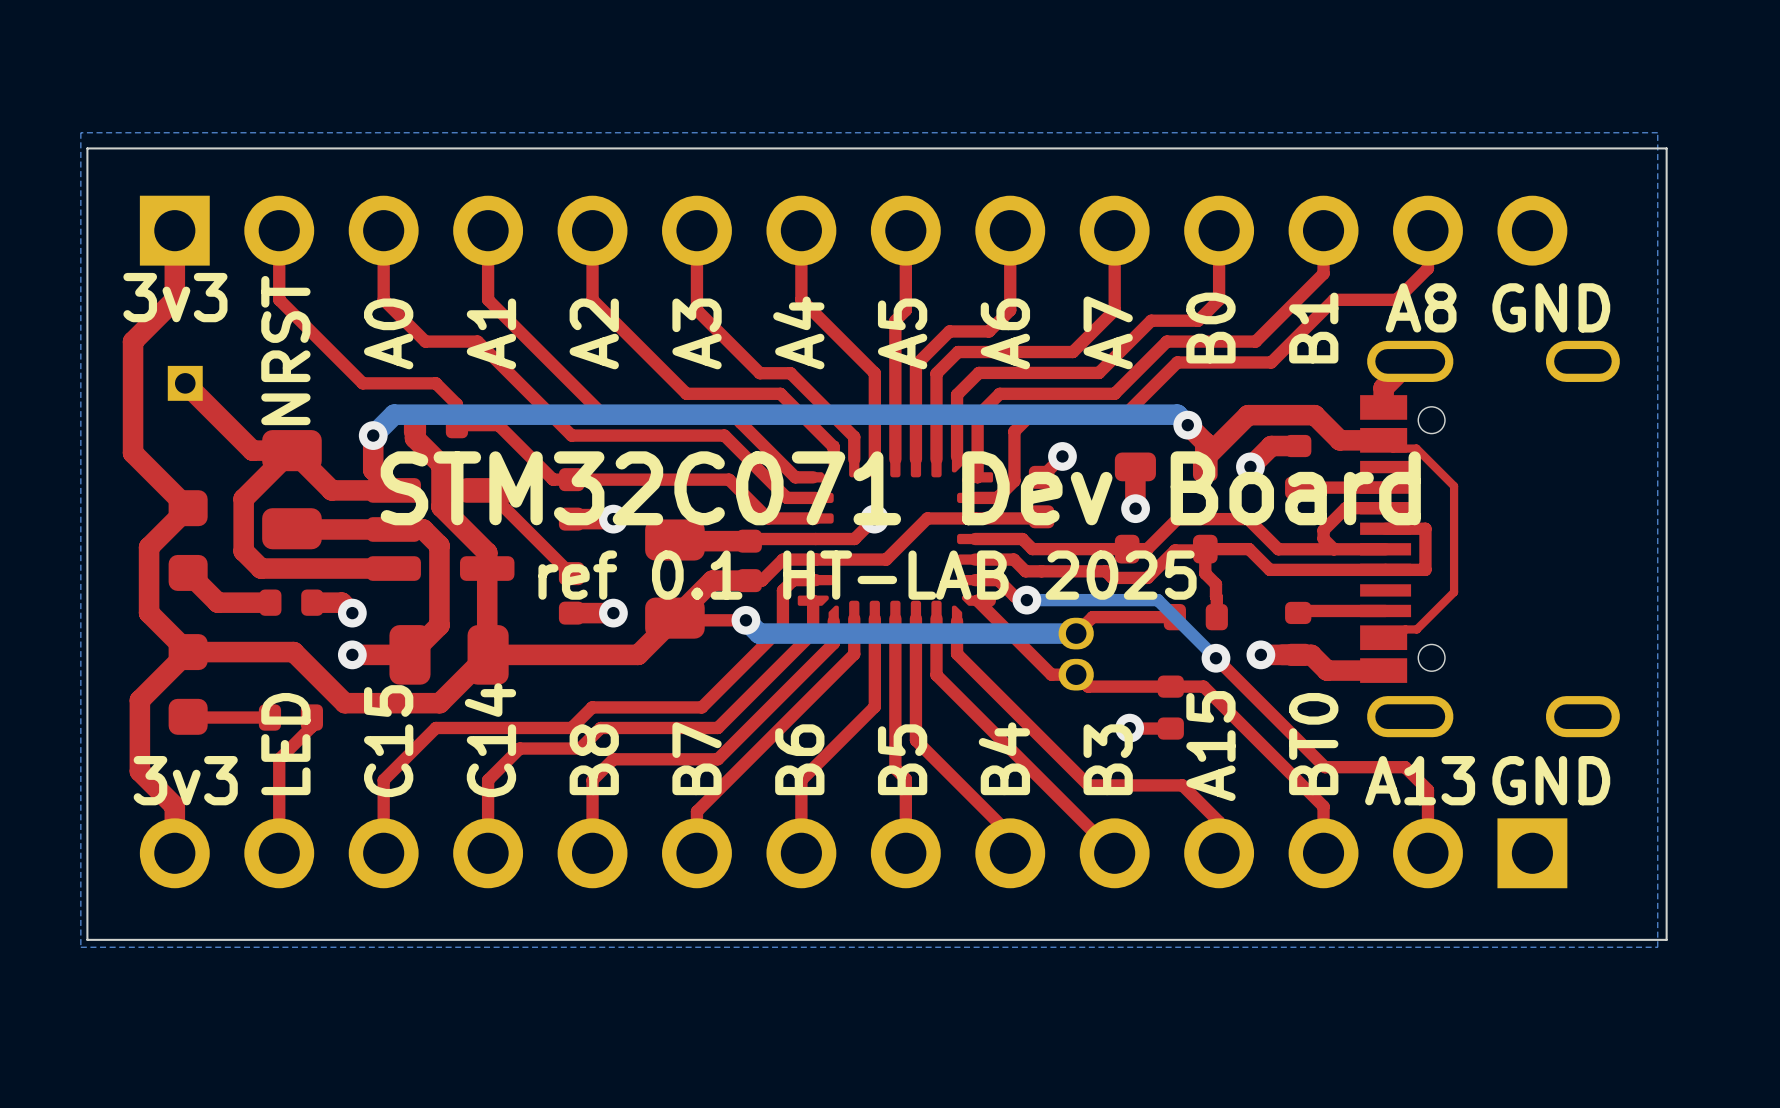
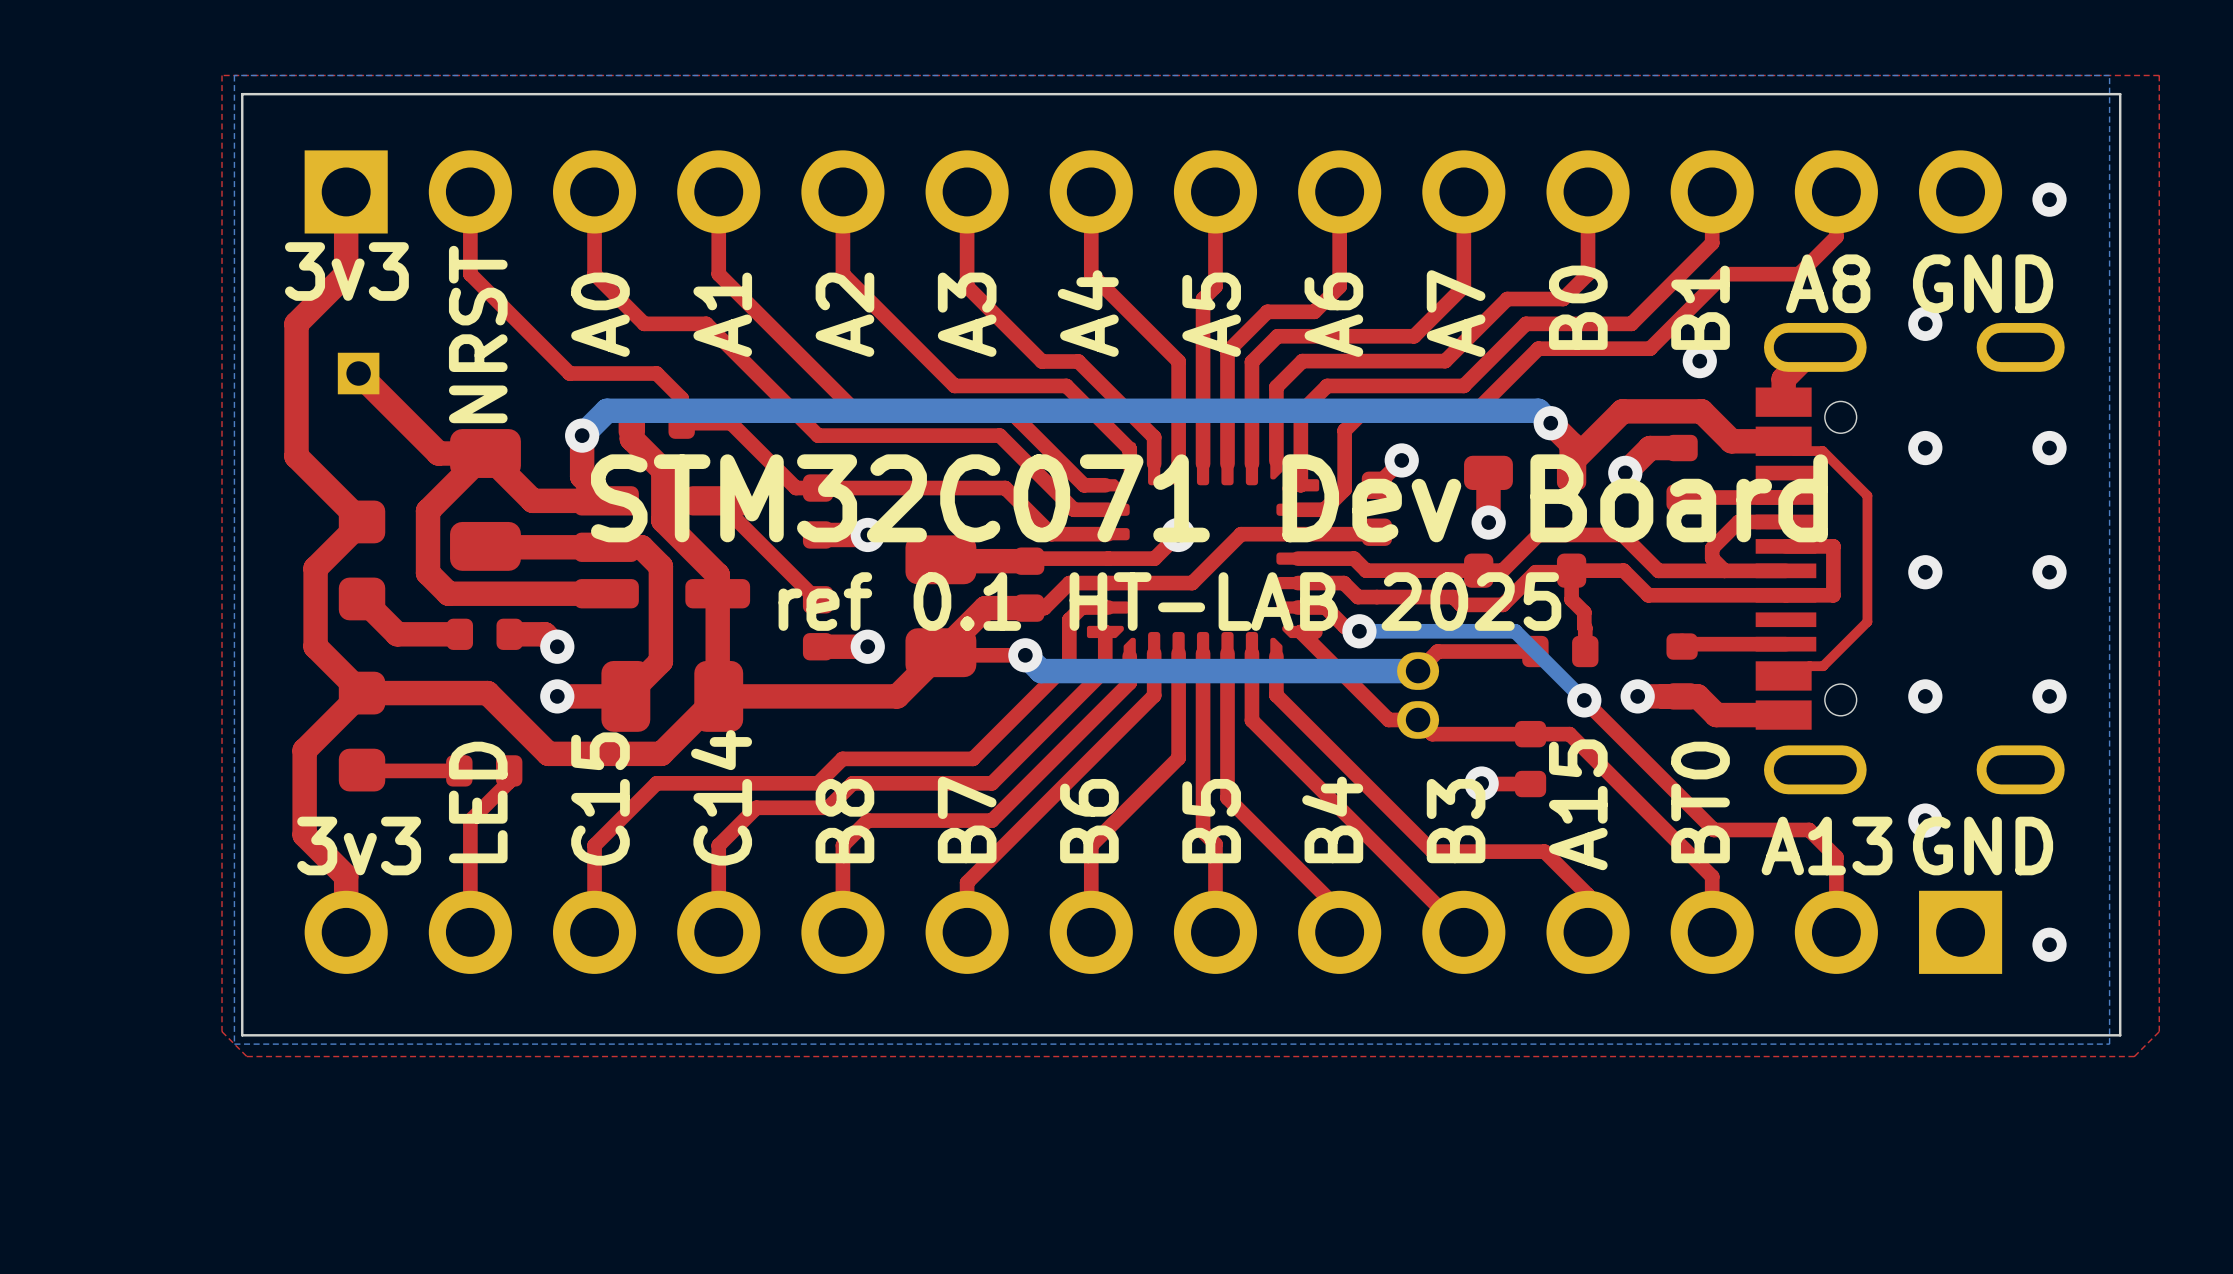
top zone outline: none -> (2159, 75) (2159, 1031) (2134, 1056) (246, 1056) (222, 1031) (222, 75) (2159, 75)
via: none -> (2049, 199)
via: none -> (1925, 323)
via: none -> (1699, 361)
via: none -> (1925, 448)
via: none -> (2049, 448)
via: none -> (1925, 572)
via: none -> (2049, 572)
via: none -> (1925, 696)
via: none -> (2049, 696)
via: none -> (1925, 820)
via: none -> (2049, 944)

